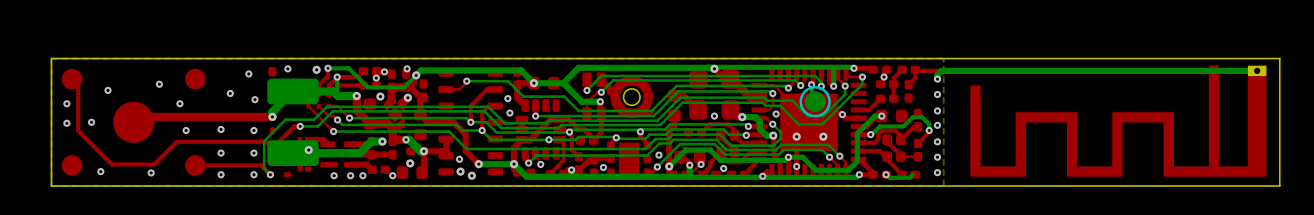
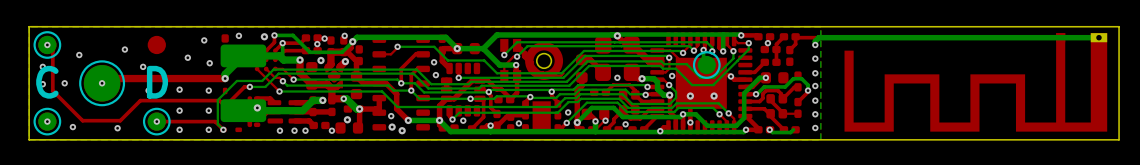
part: none -> (47, 44)
via: none -> (47, 44)
text: none -> C (47, 82)
text: none -> D (157, 82)
part: none -> (102, 83)
via: none -> (102, 83)
part: none -> (47, 121)
via: none -> (47, 121)
part: none -> (156, 121)
via: none -> (156, 121)

